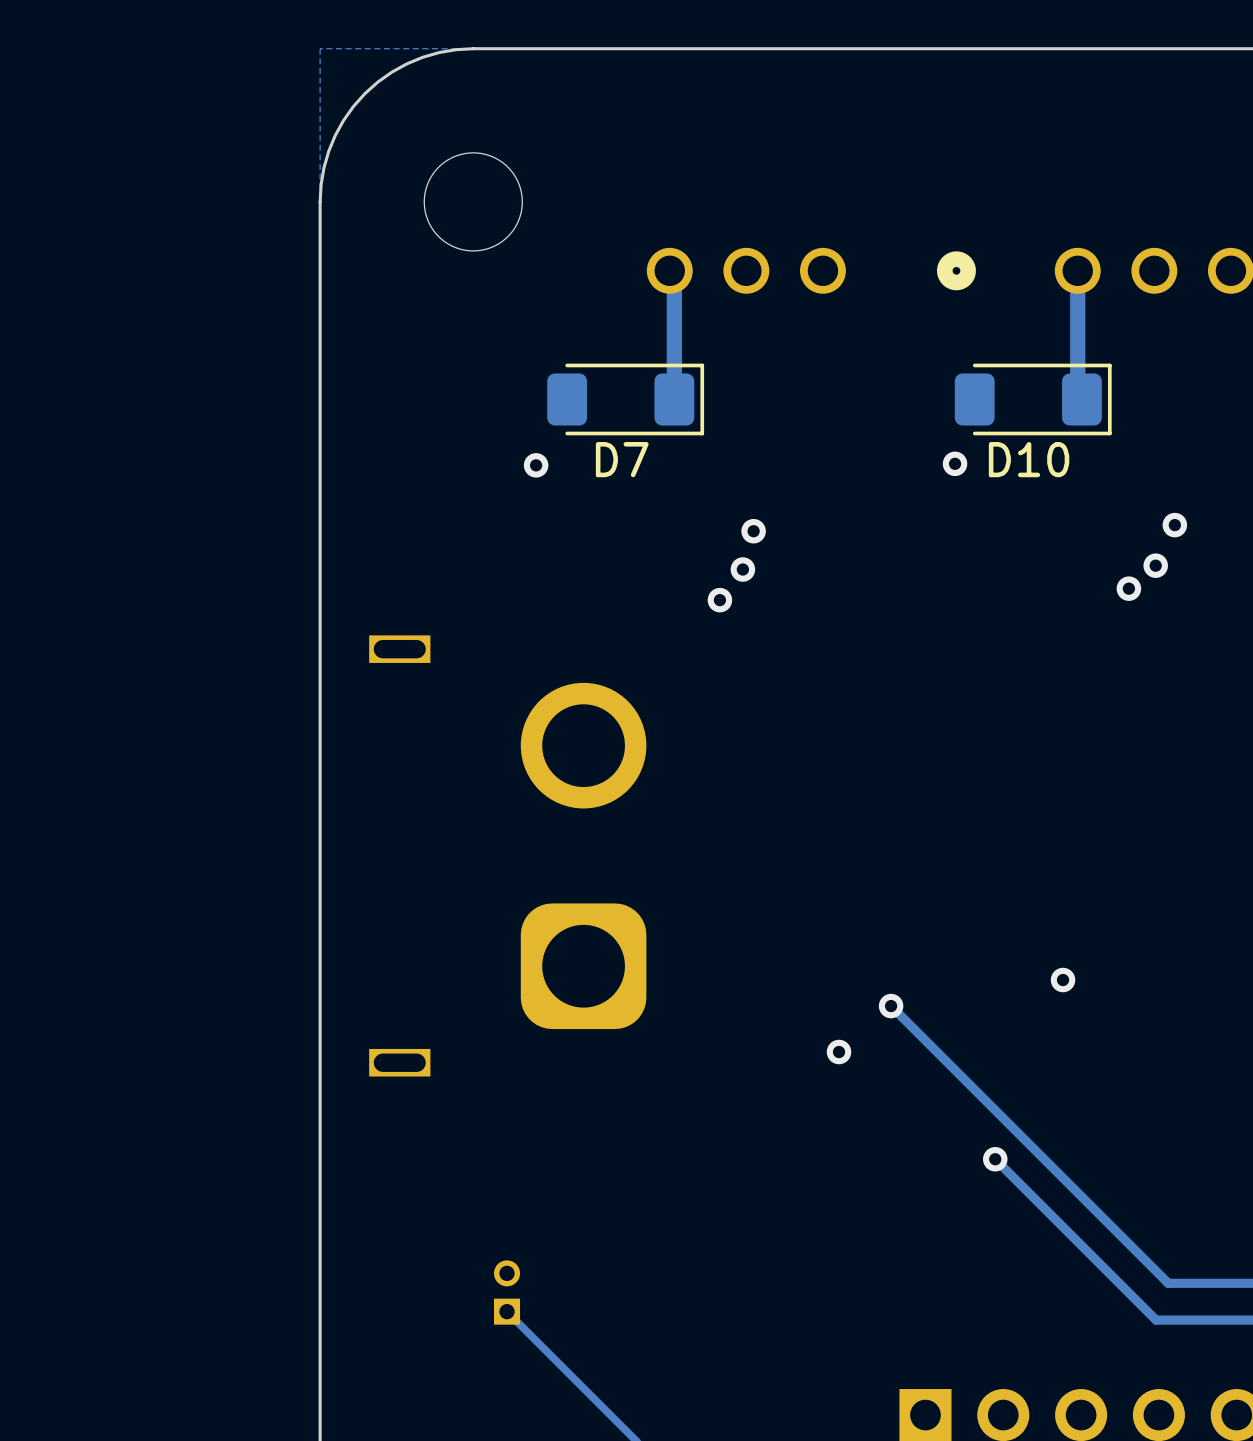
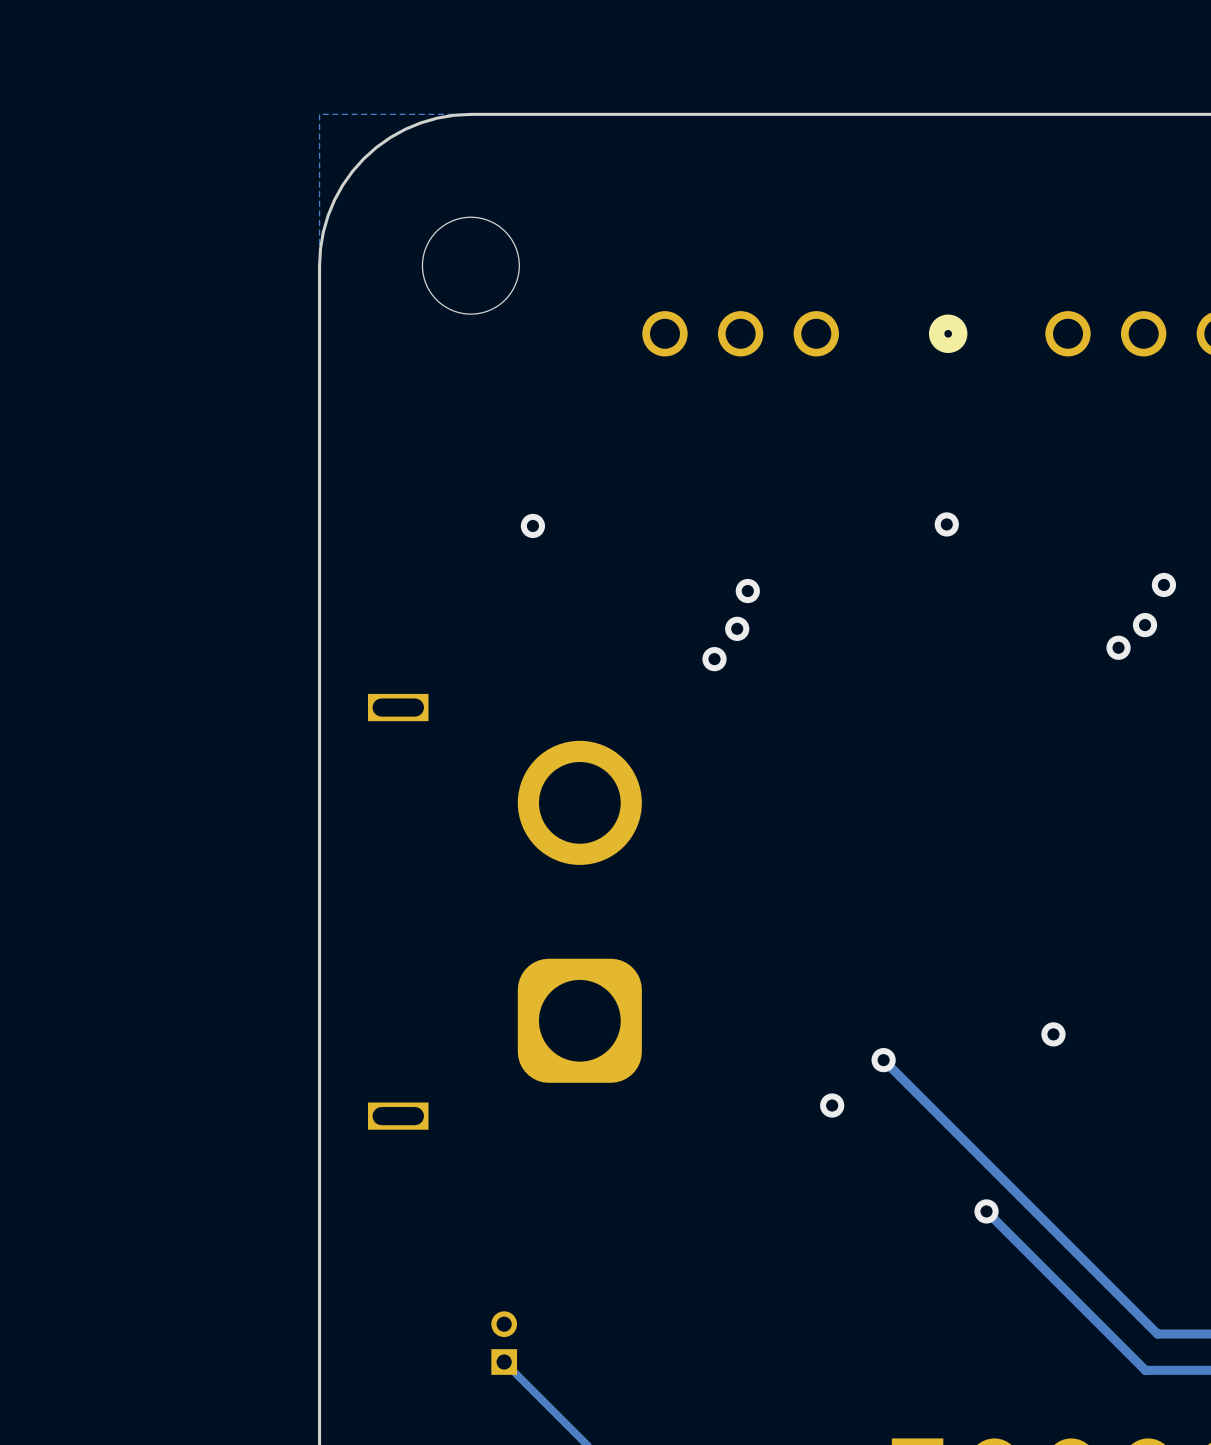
track: (669, 270) (674, 275) (674, 399) -> none
track: (1077, 270) (1077, 395) (1081, 399) -> none
D7: (625, 399) -> none
D10: (1033, 399) -> none

